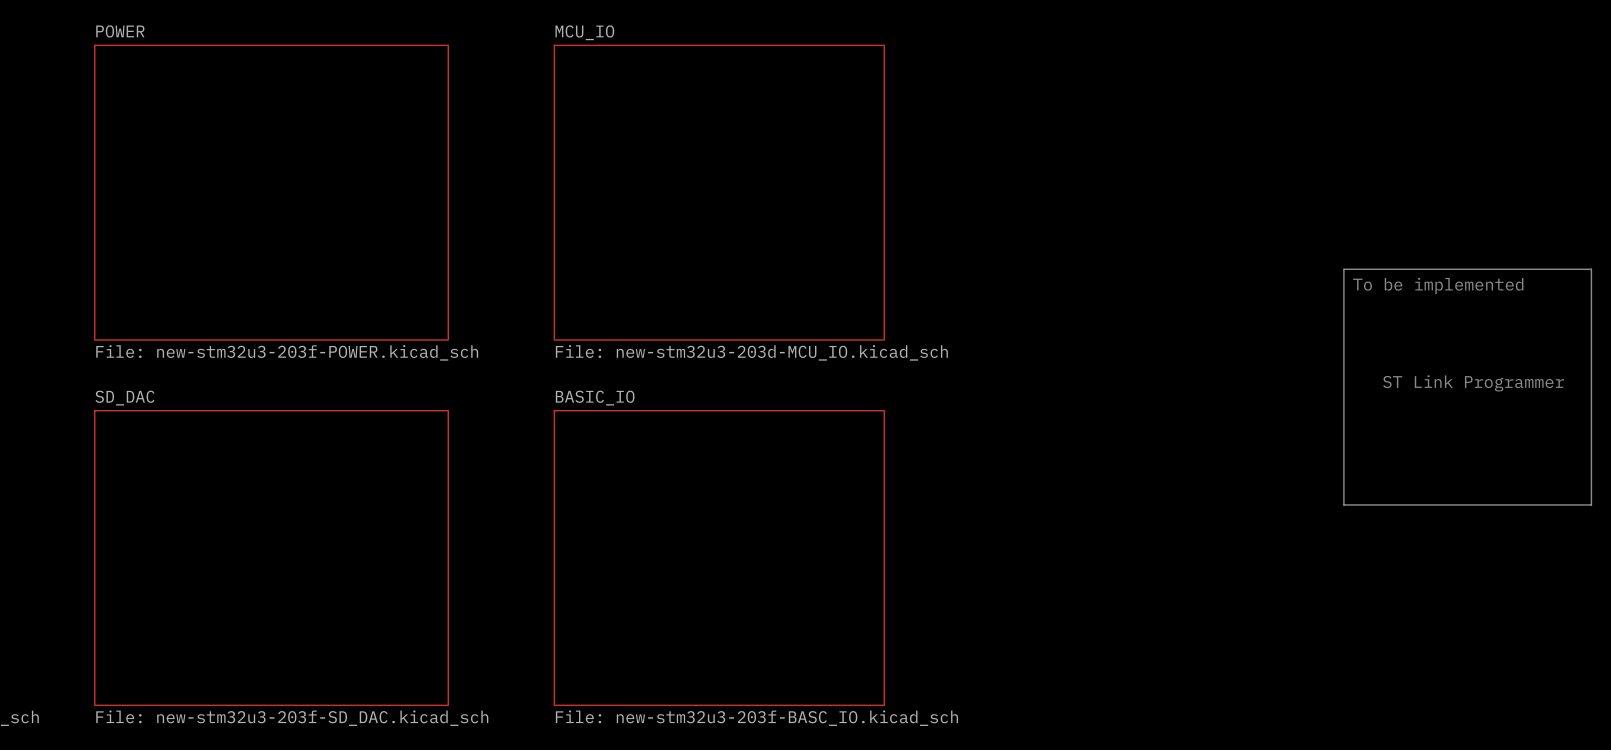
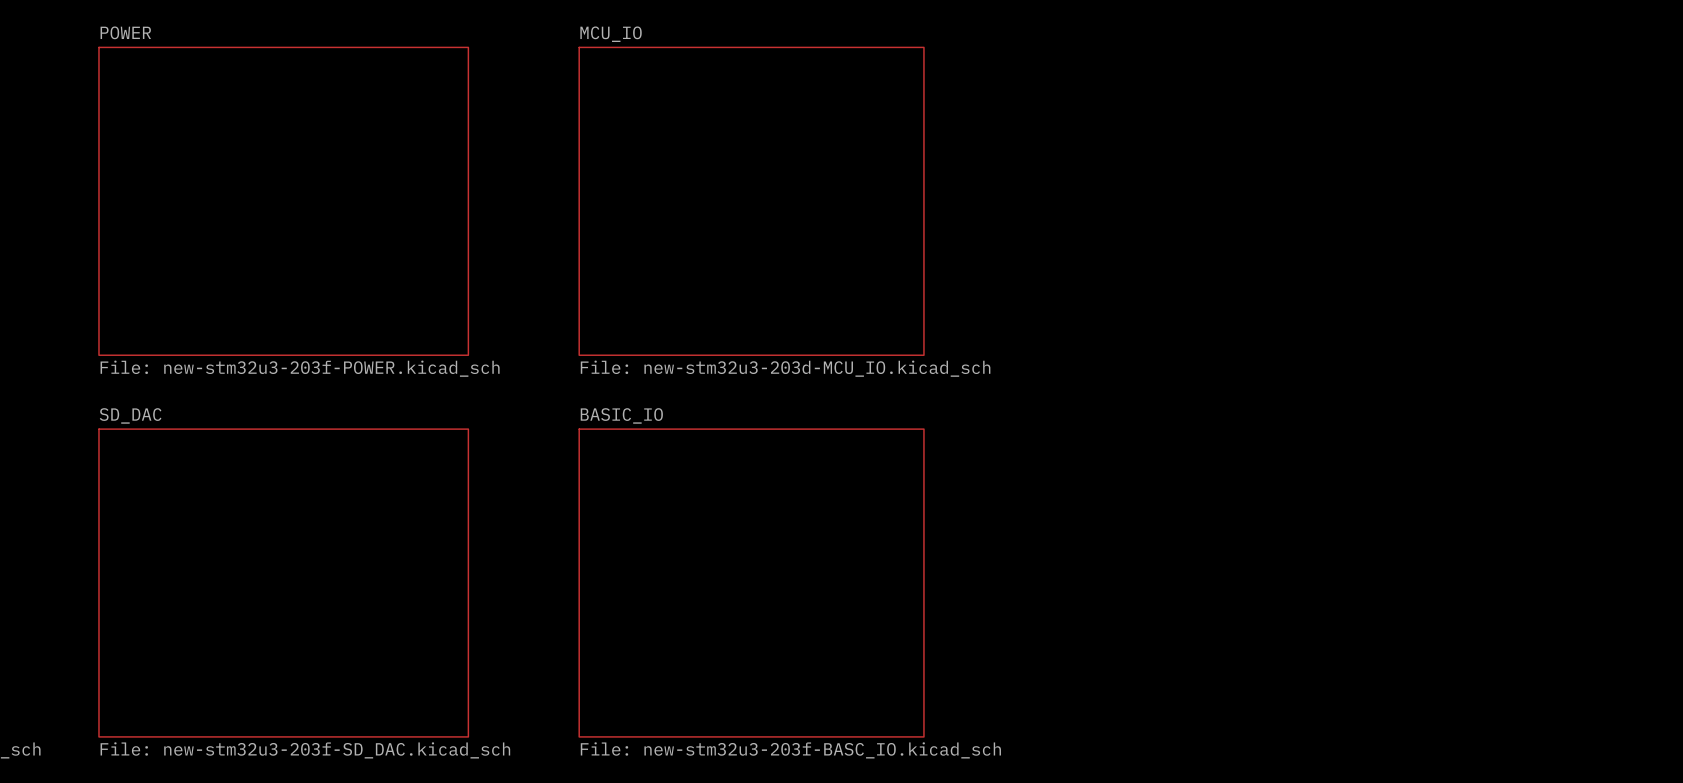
line: (1343, 269) (1591, 269) (1591, 504) (1343, 504) (1343, 269) -> none
text: To be implemented (1438, 285) -> none
text: ST Link Programmer (1473, 383) -> none

